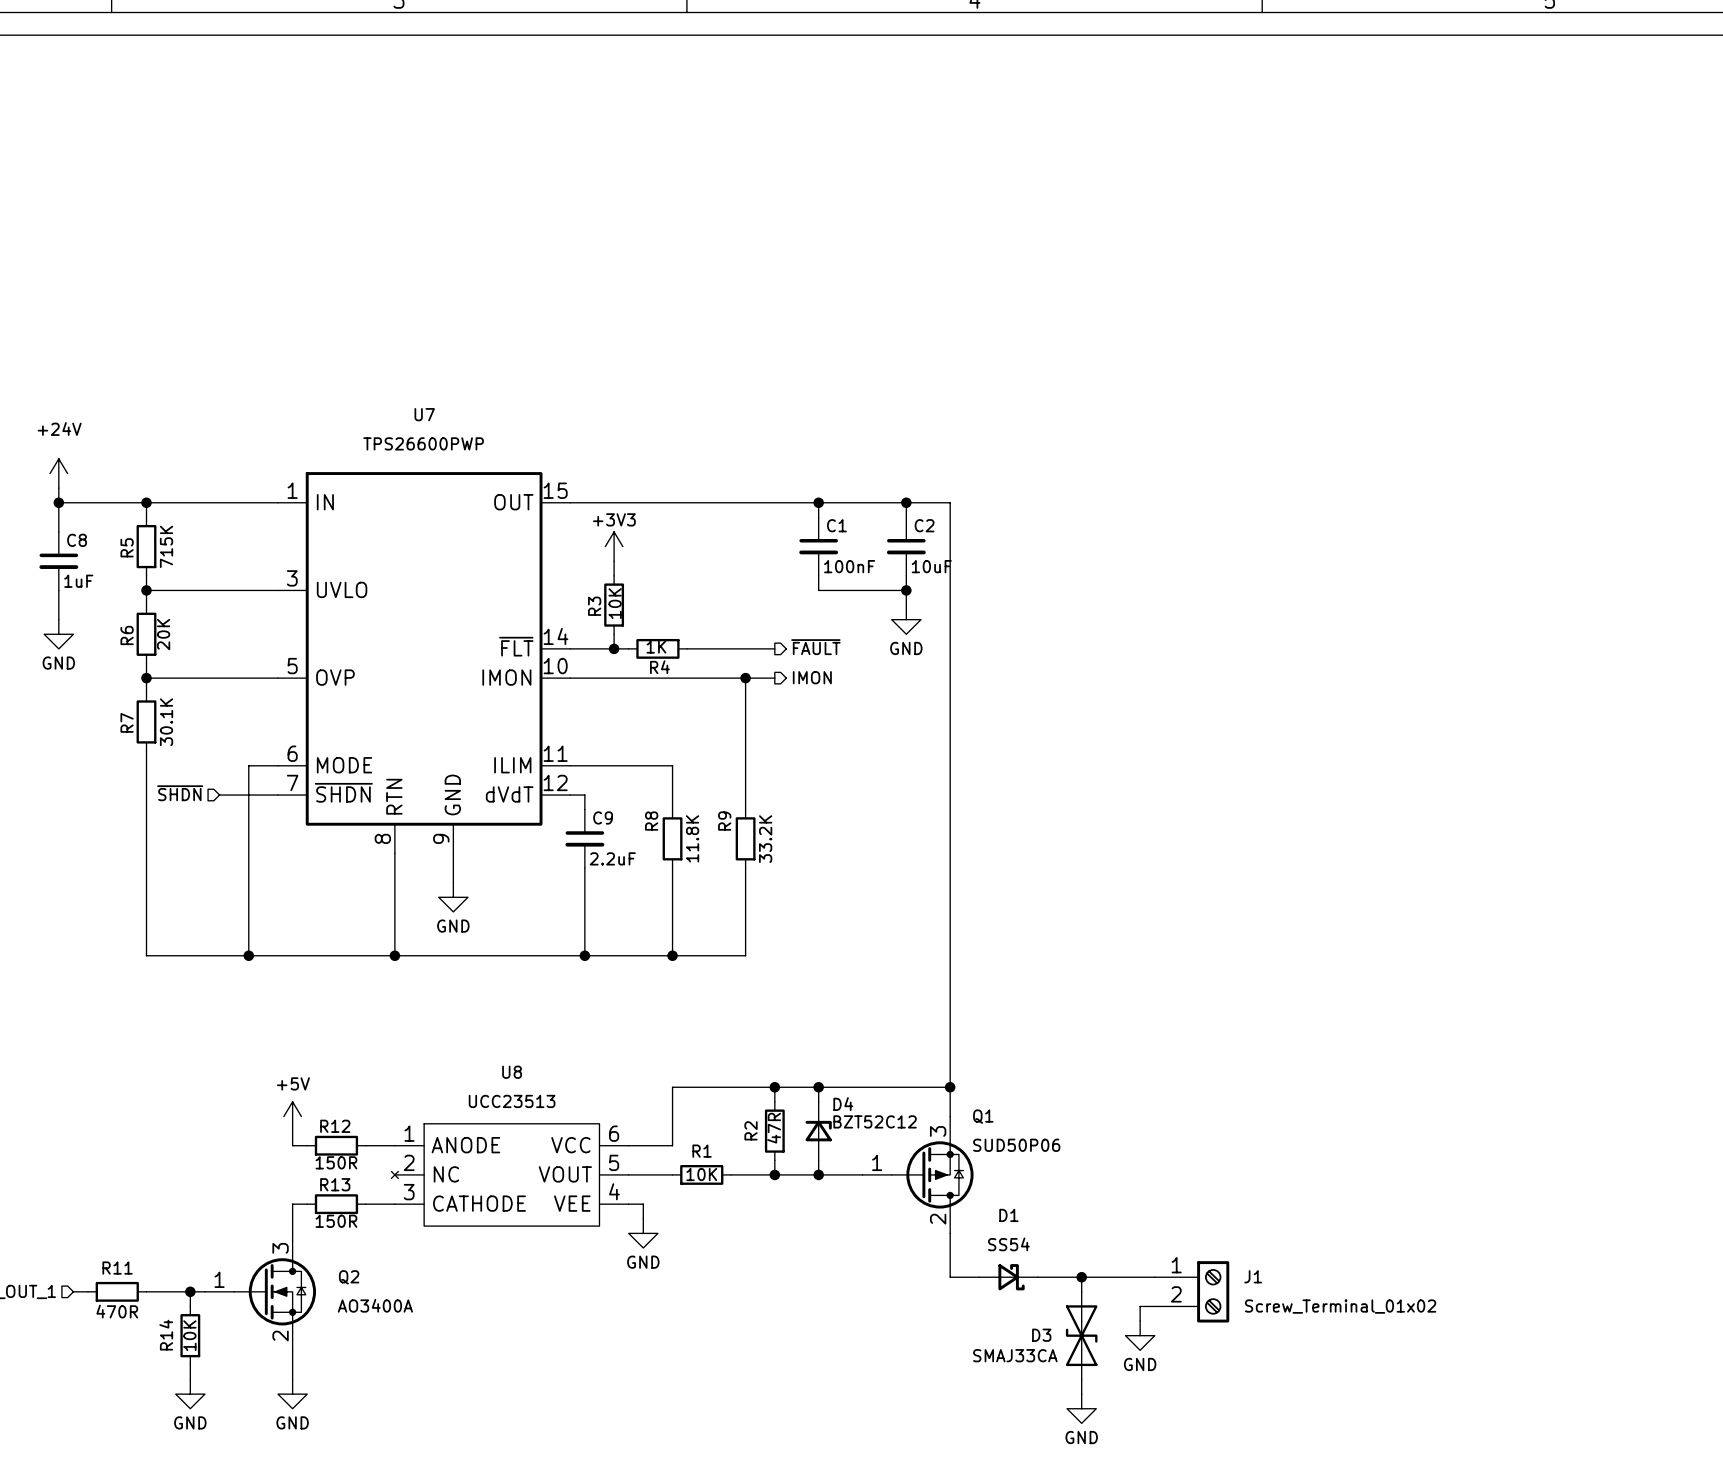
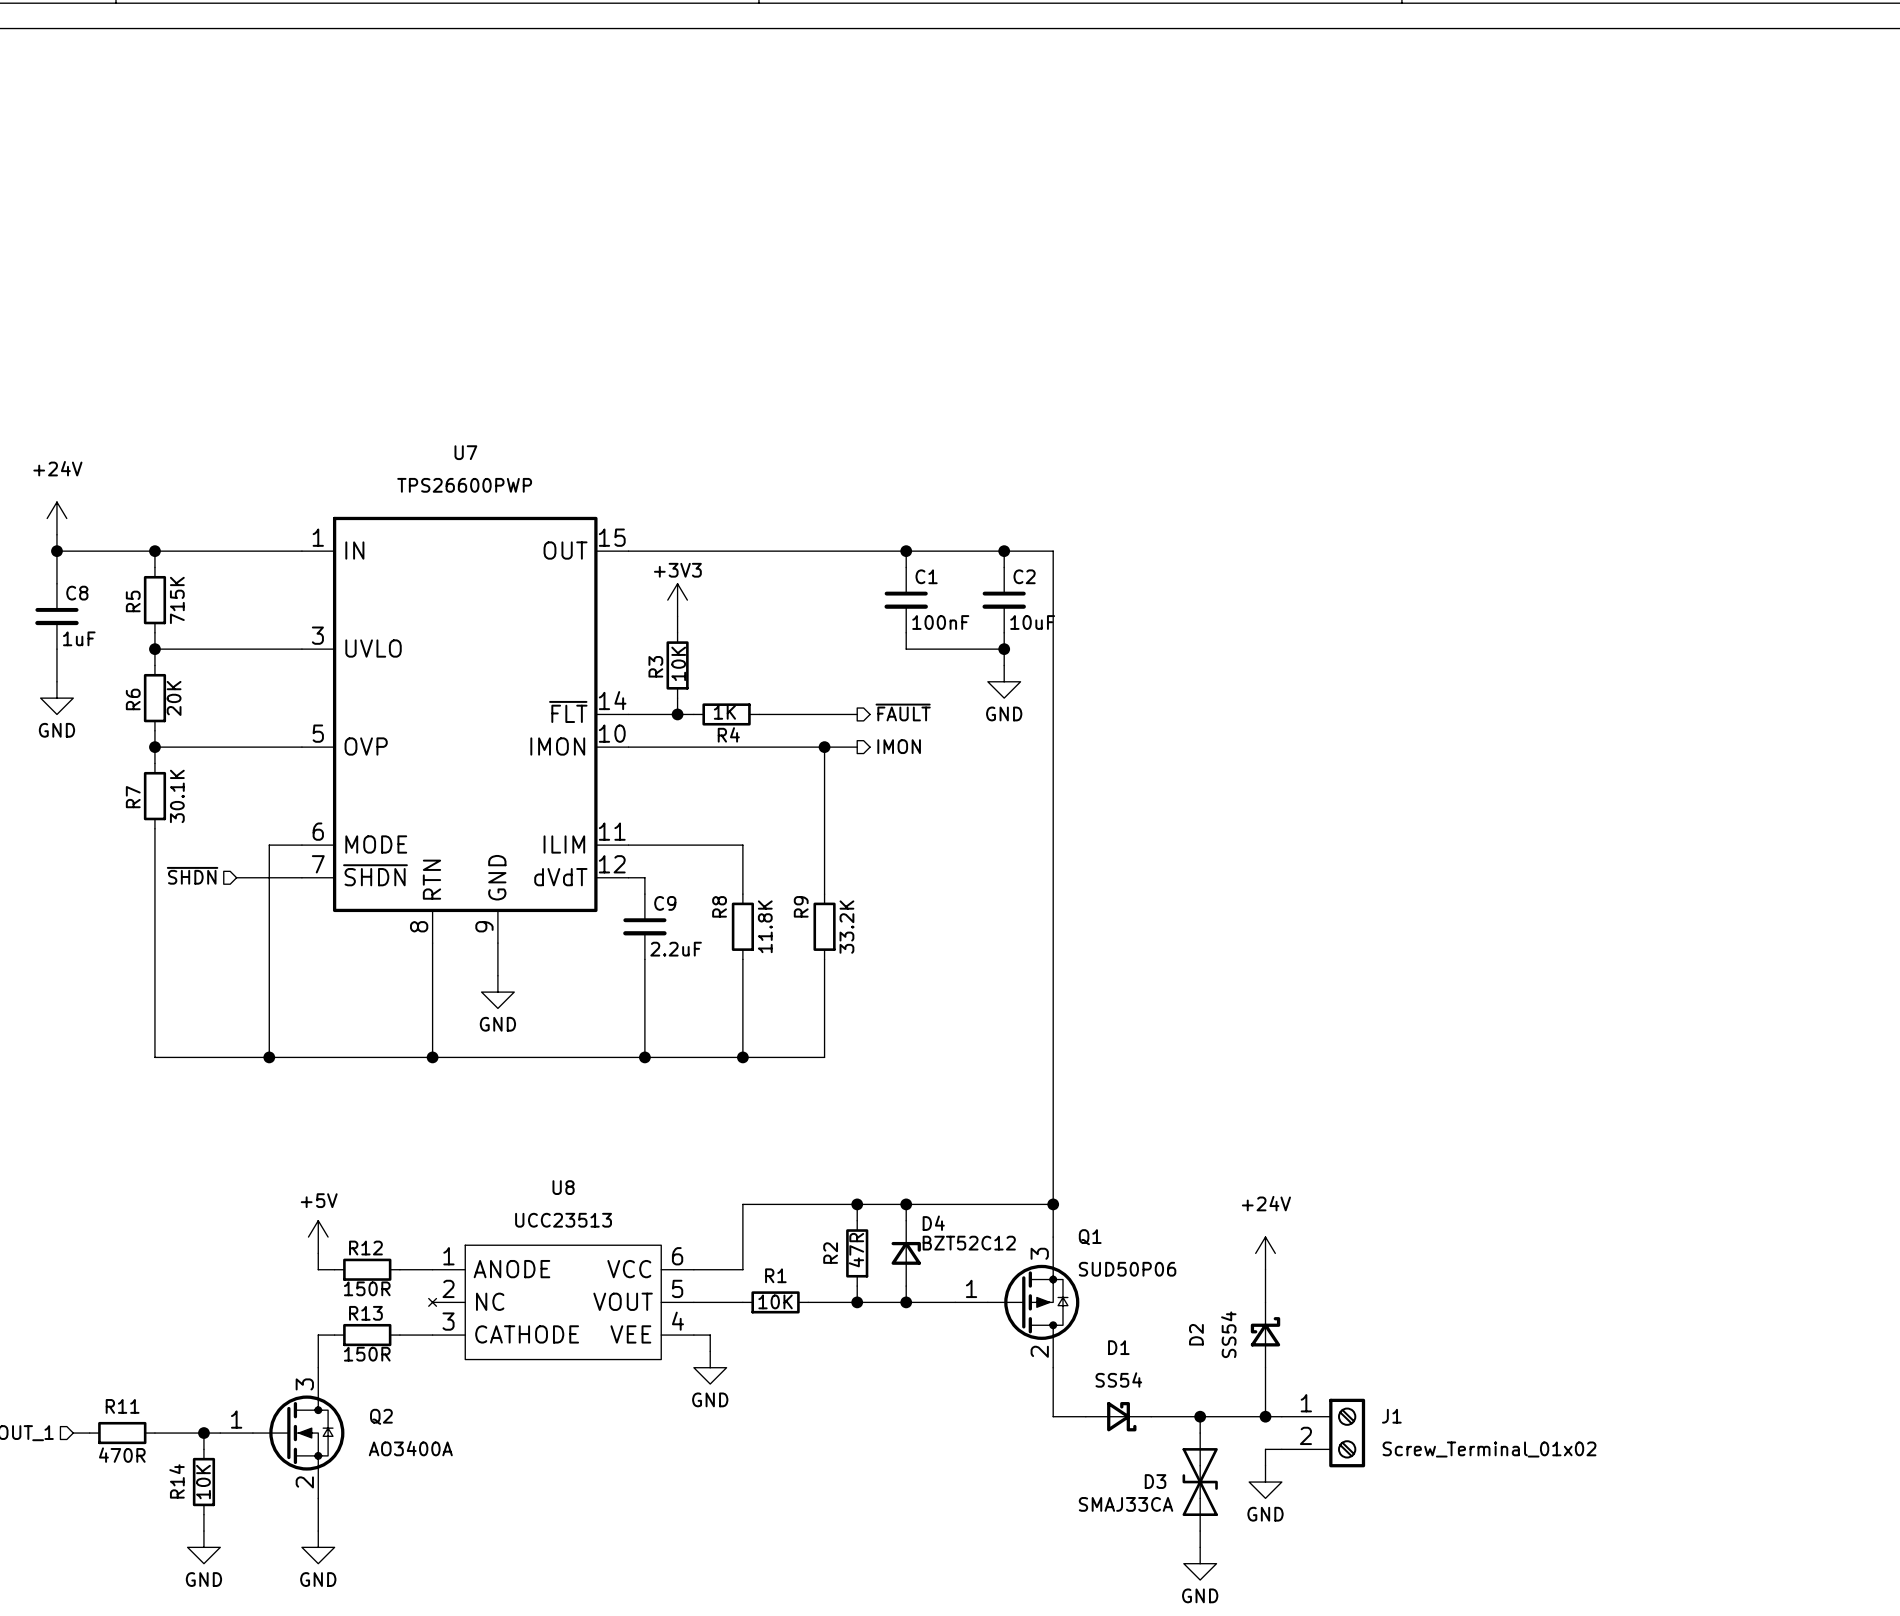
power symbol: none -> +24V (1265, 1253)
wire: none -> (1265, 1269) (1265, 1302)
D2: none -> SS54 (1265, 1335)
wire: none -> (1265, 1367) (1265, 1416)
junction: none -> (1265, 1416)

